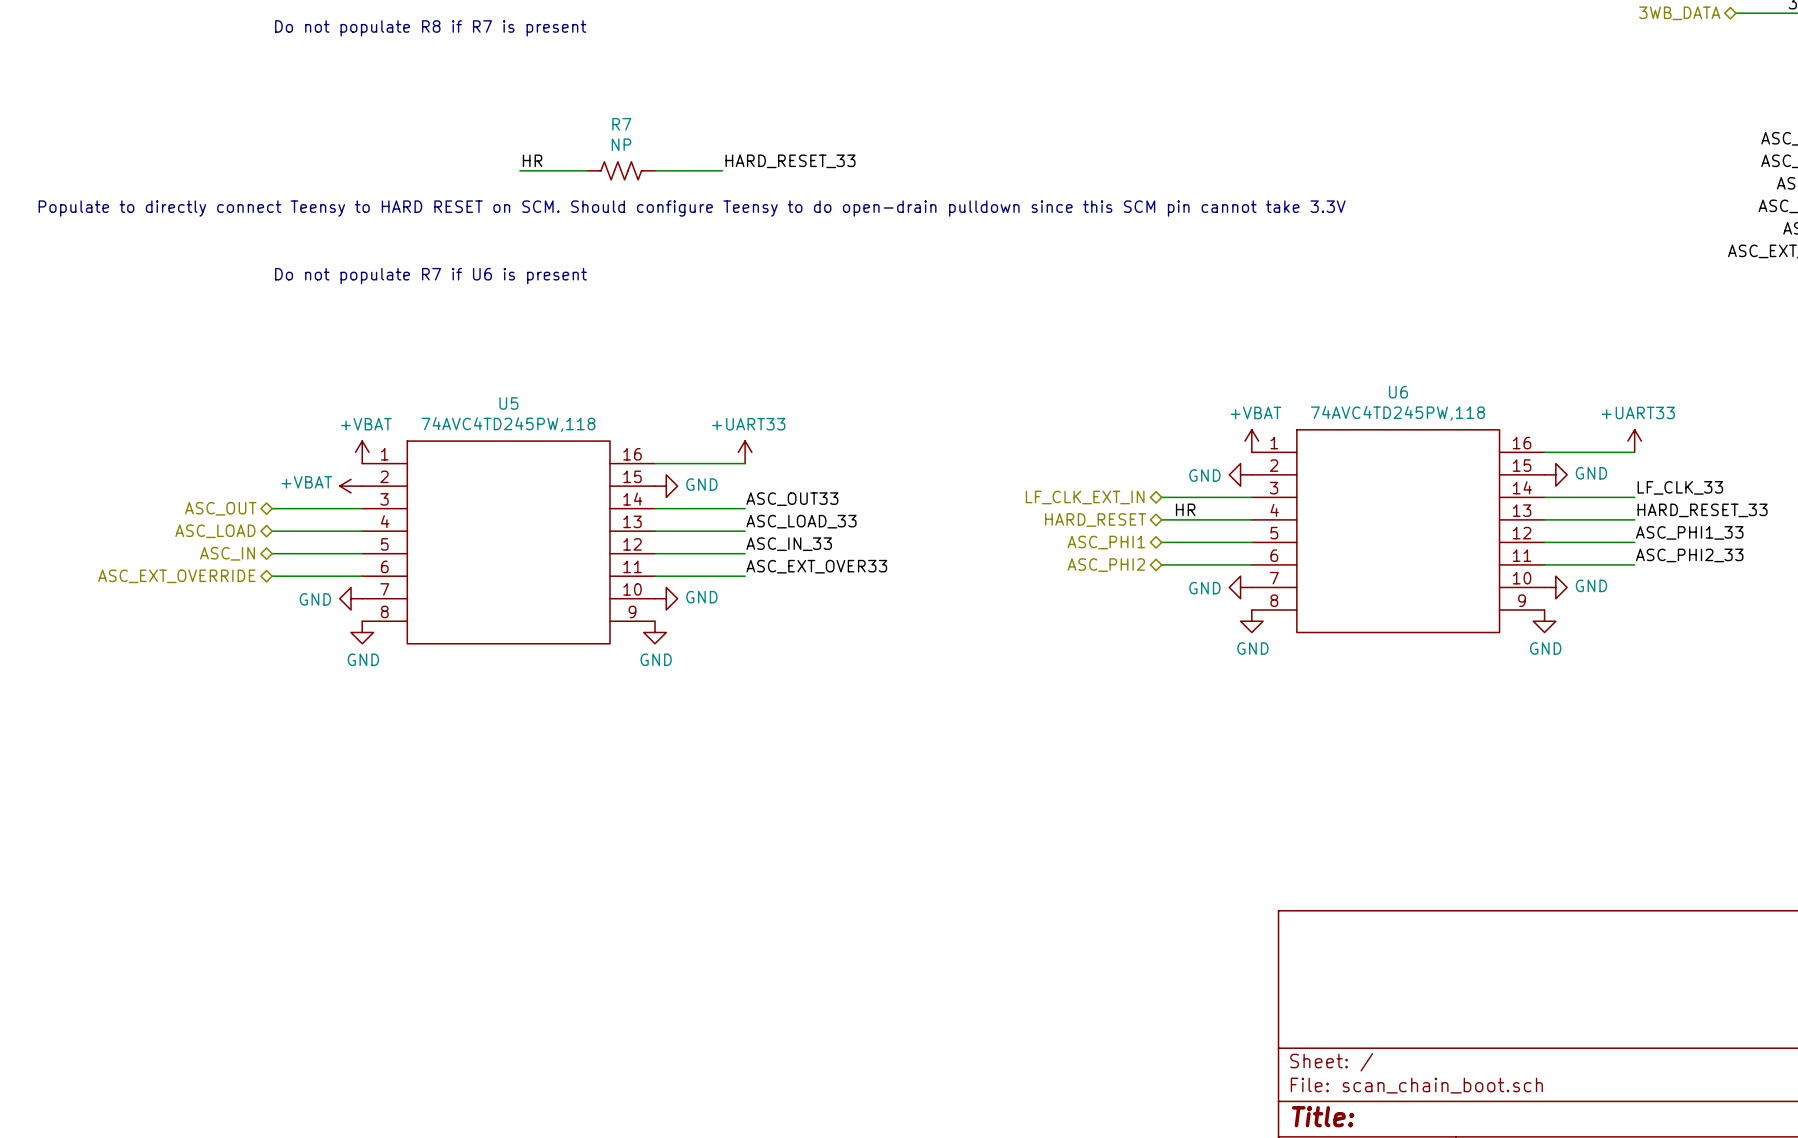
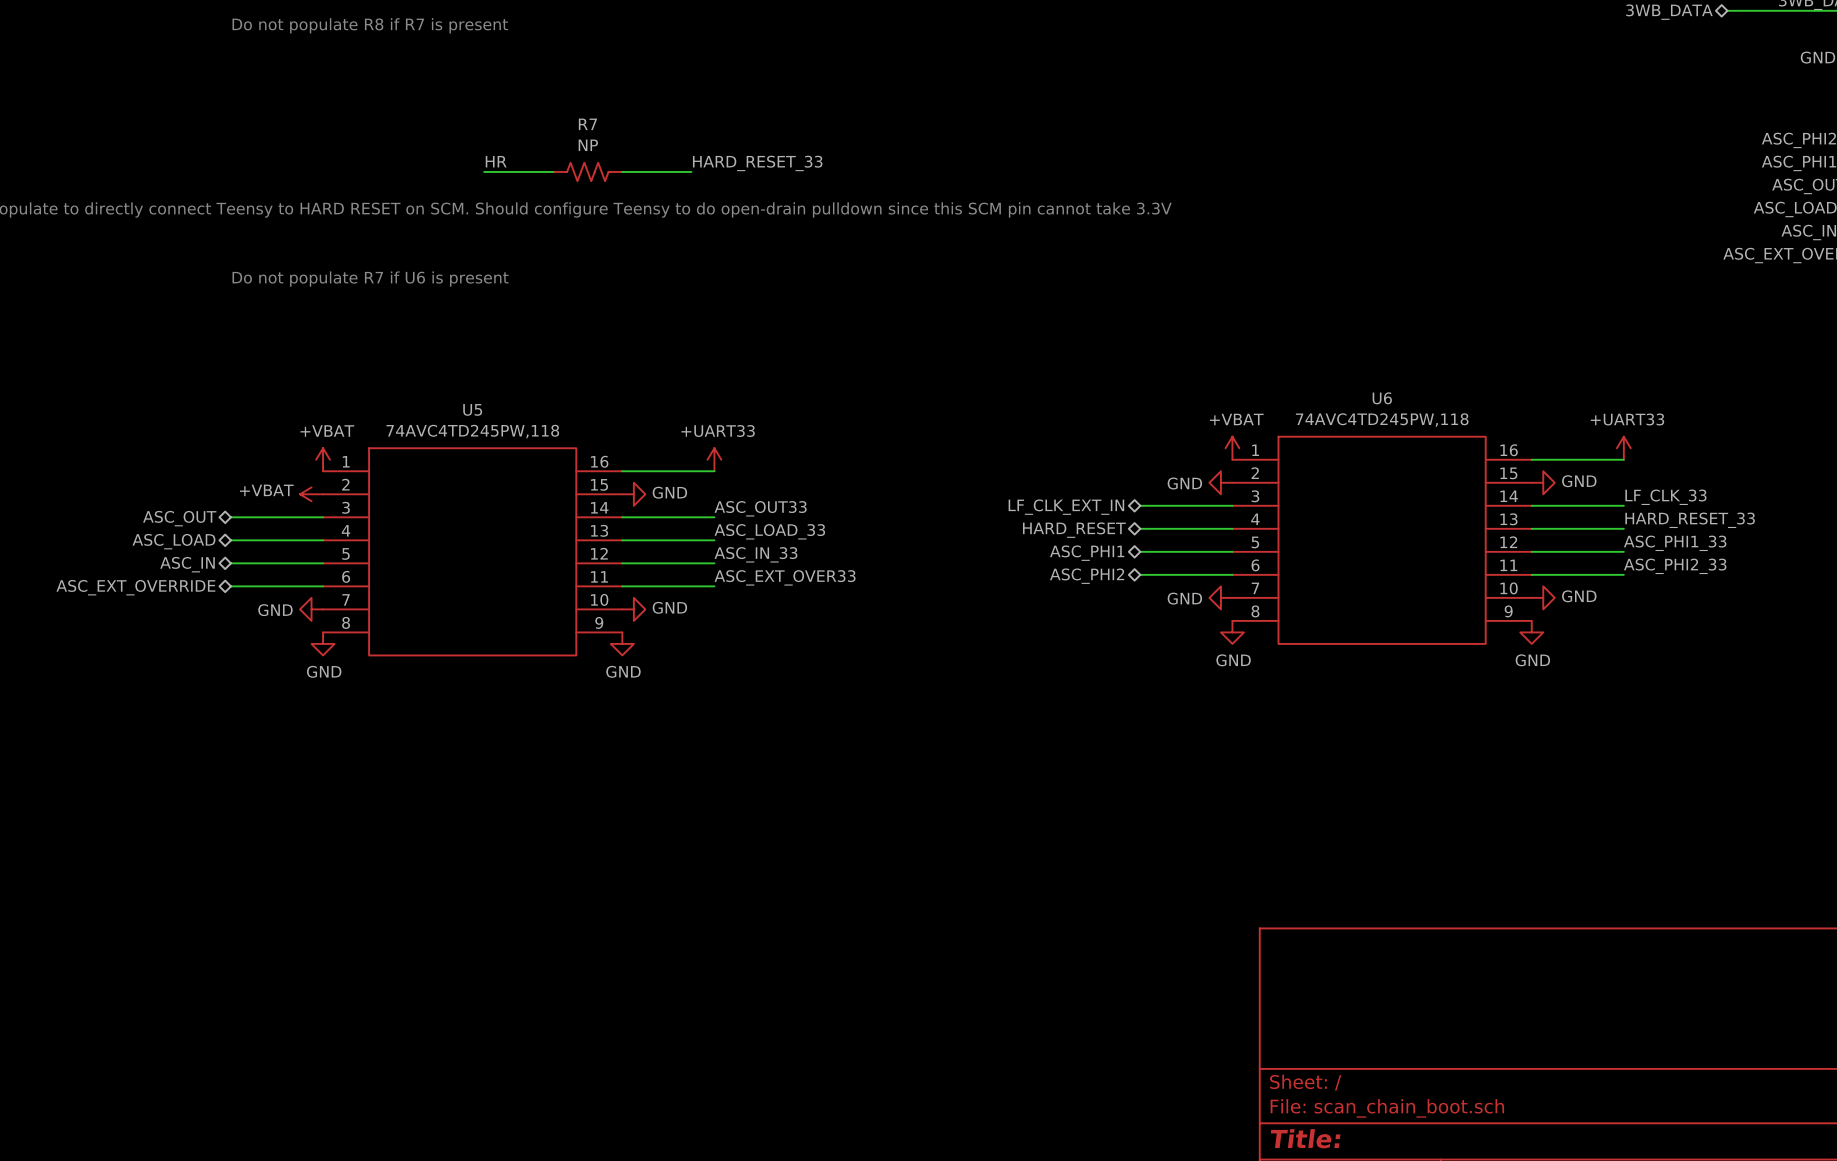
label: HR (1185, 509) -> none

